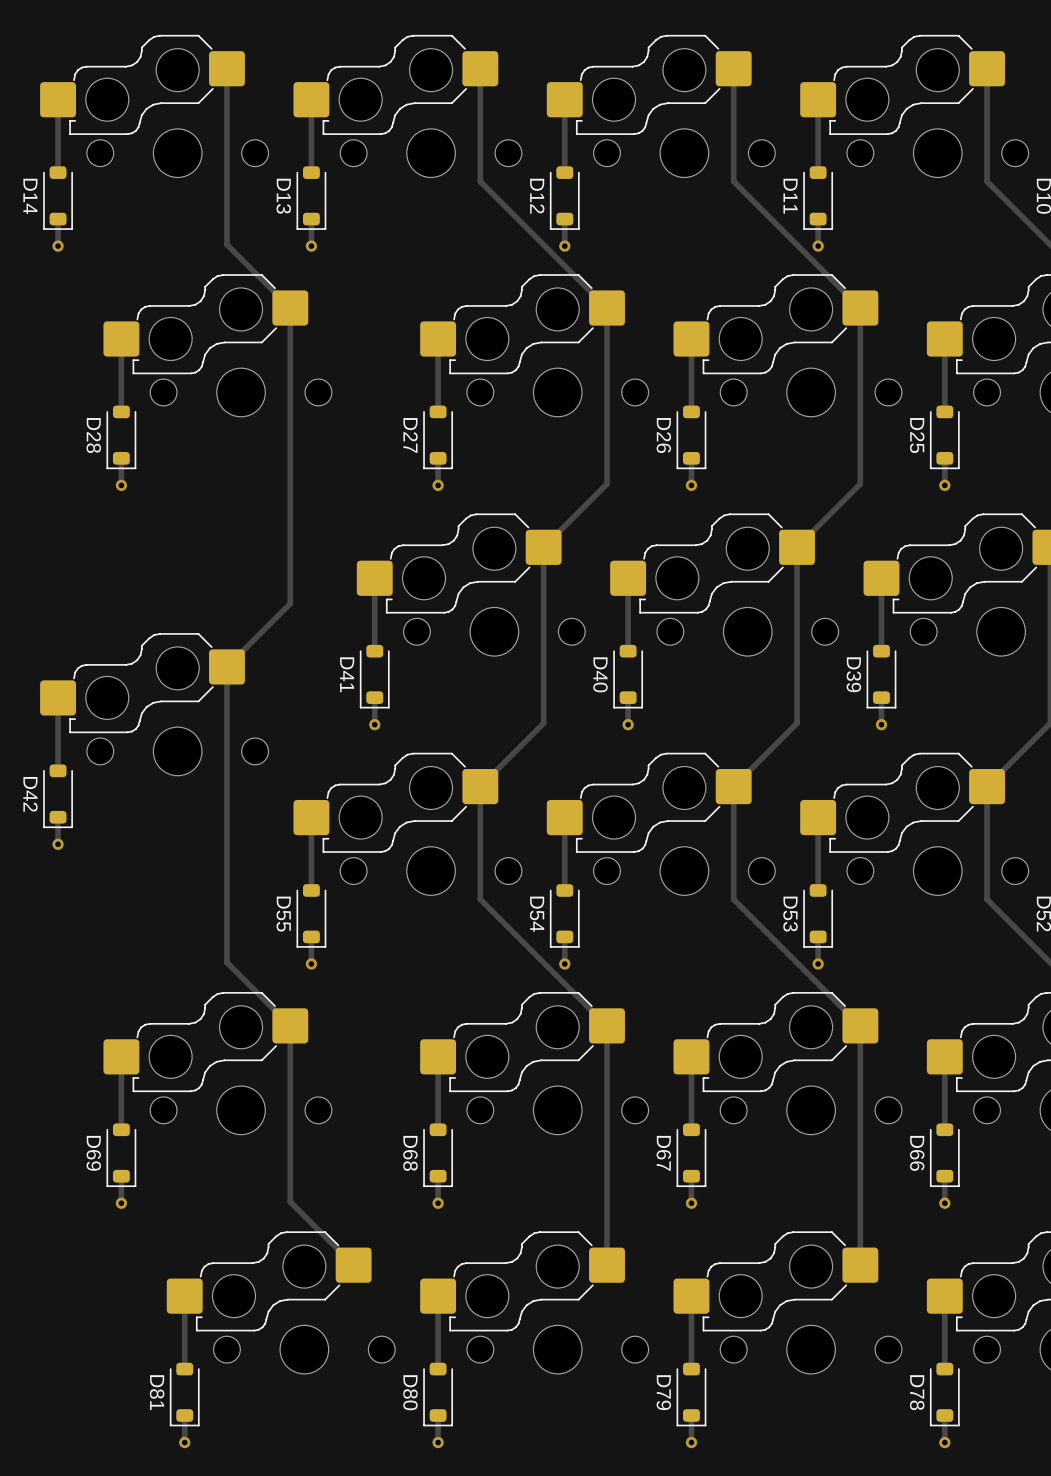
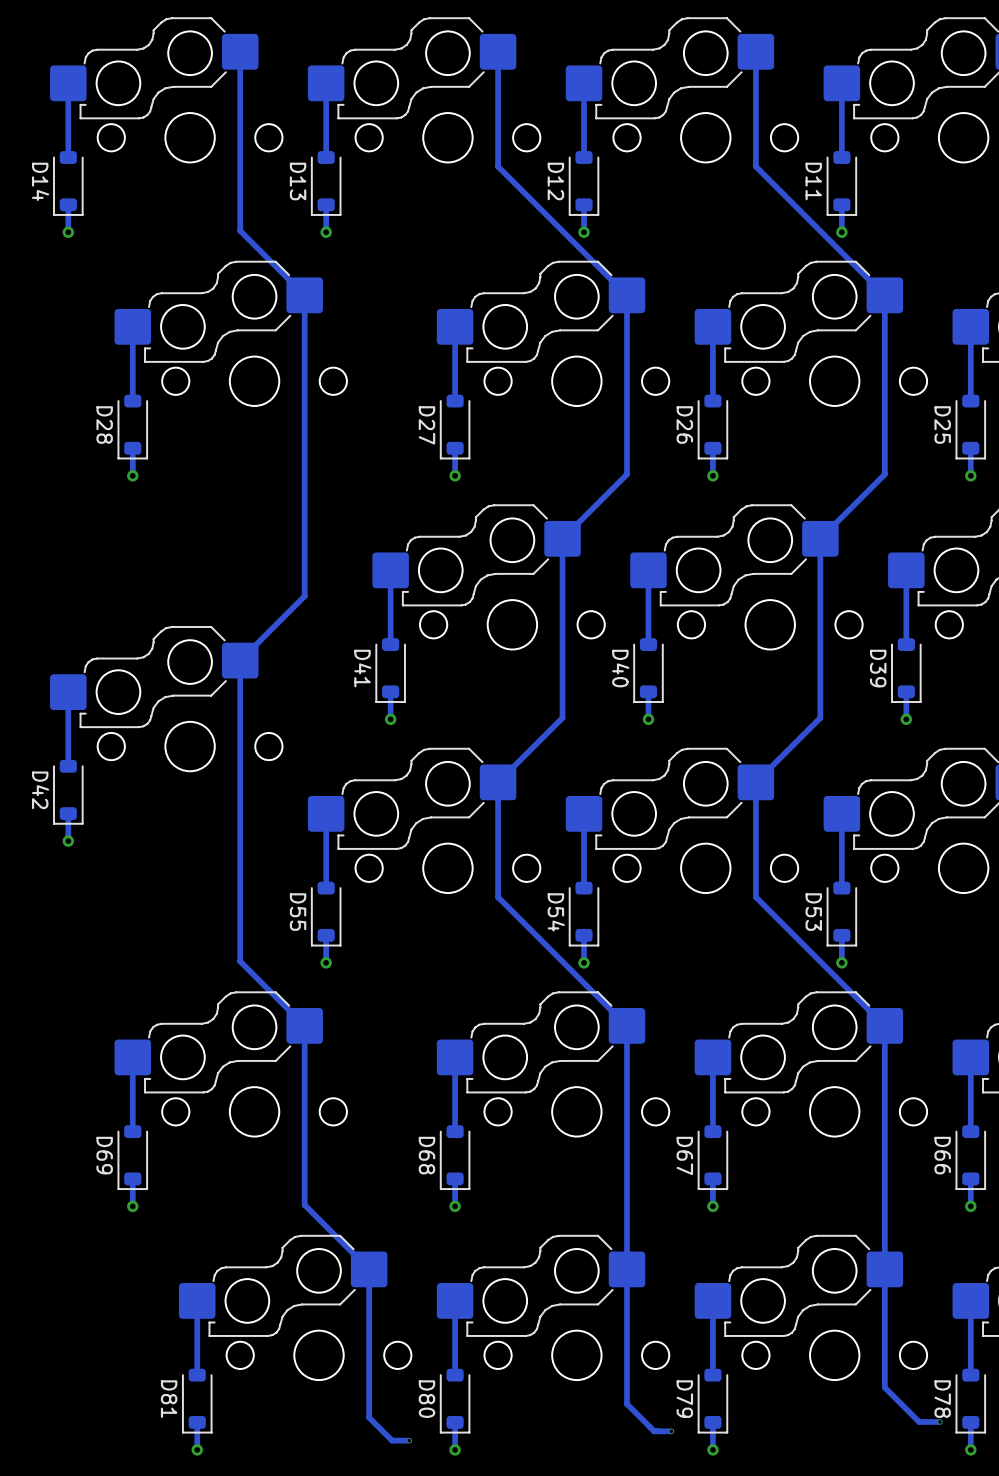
track: none -> (369, 1269) (369, 1417) (392, 1440) (409, 1440)
track: none -> (626, 1269) (626, 1404) (654, 1431) (671, 1431)
track: none -> (884, 1269) (884, 1387) (919, 1421) (939, 1421)
via: none -> (939, 1421)
via: none -> (671, 1431)
via: none -> (409, 1440)

